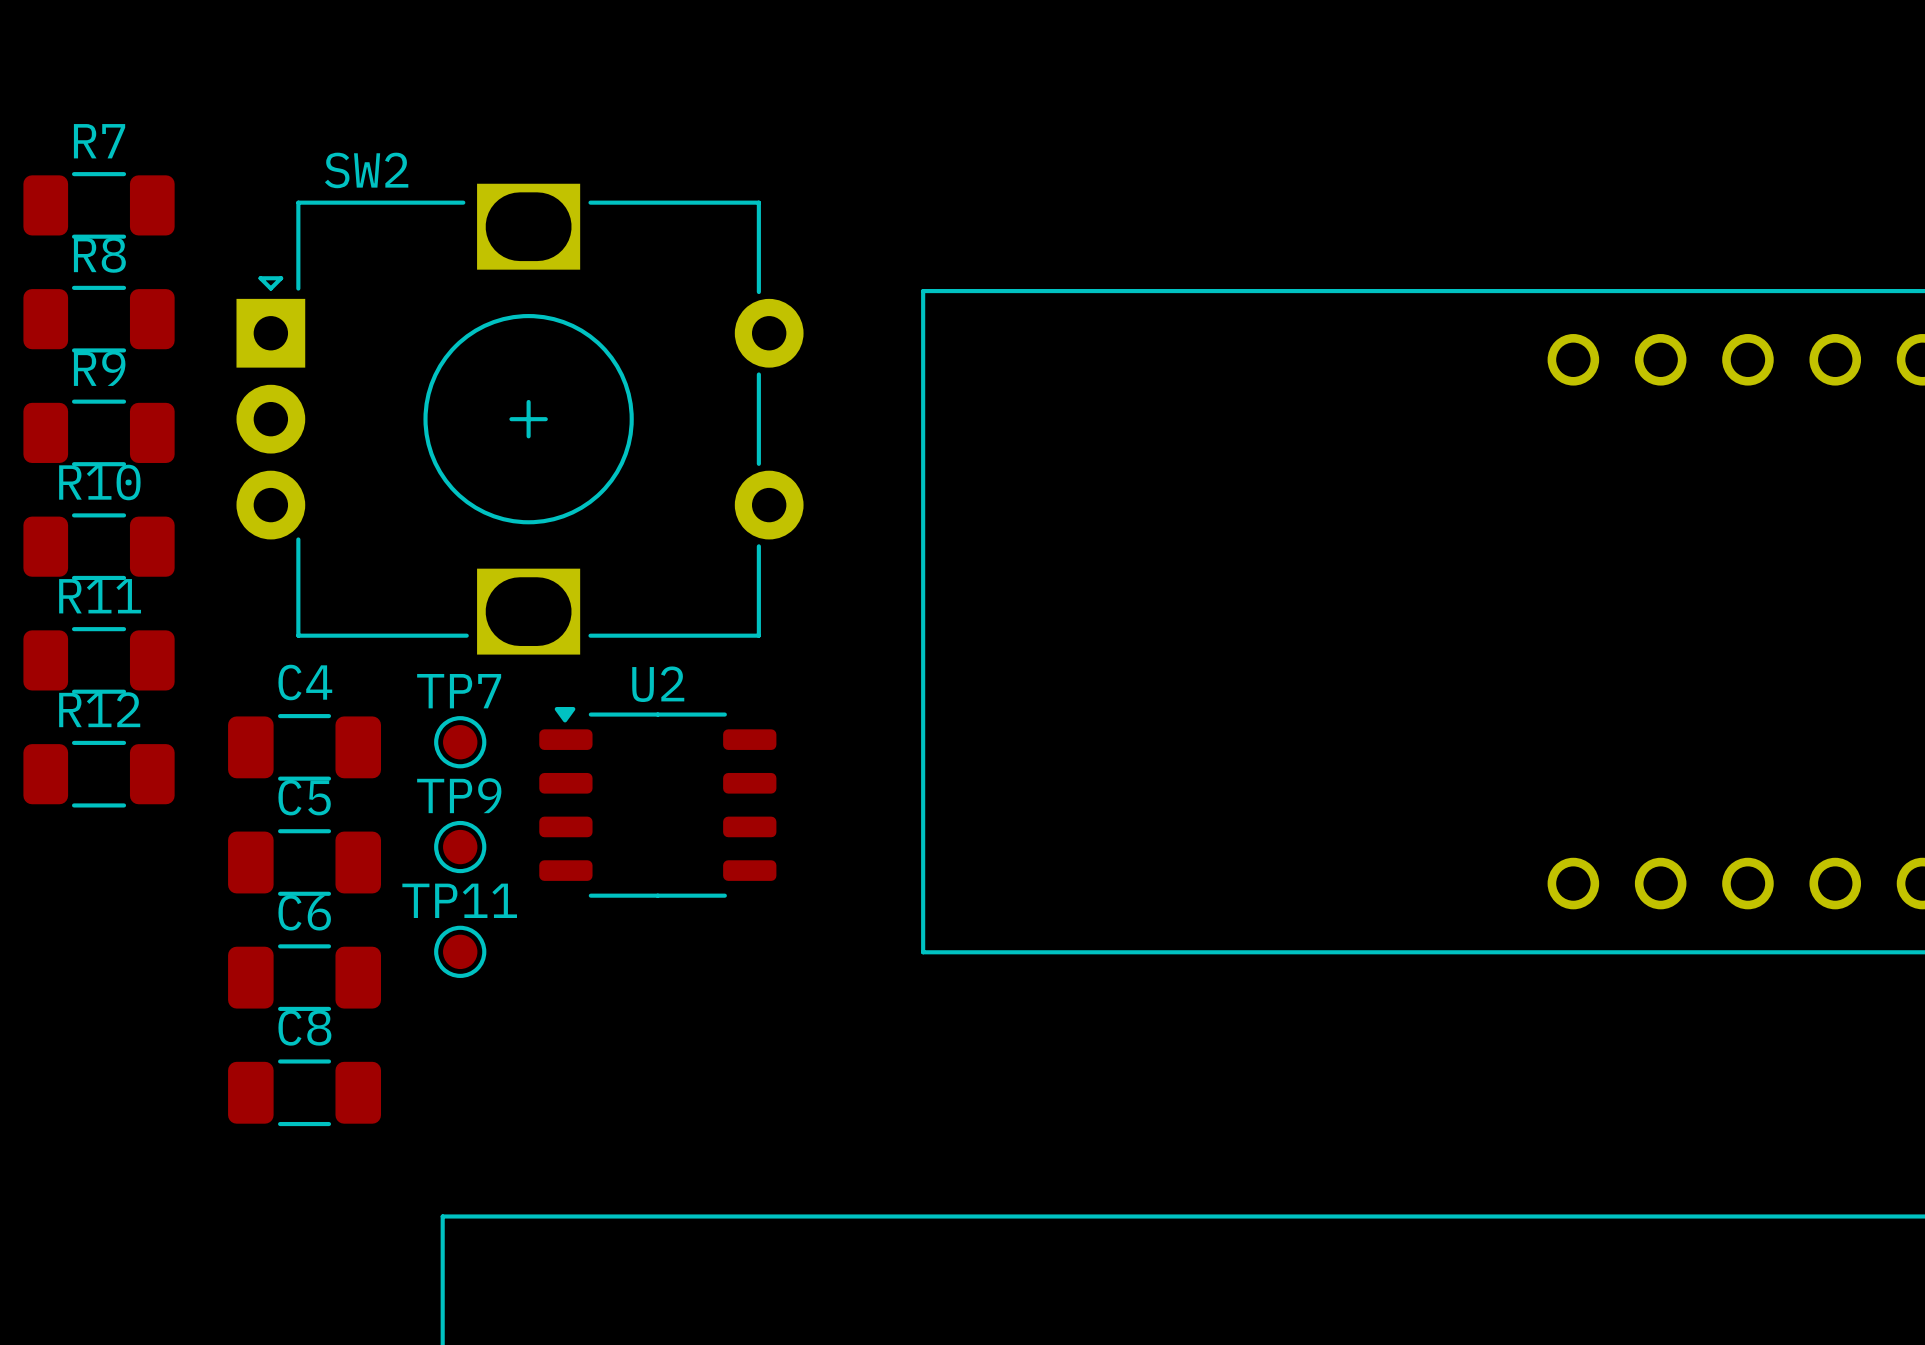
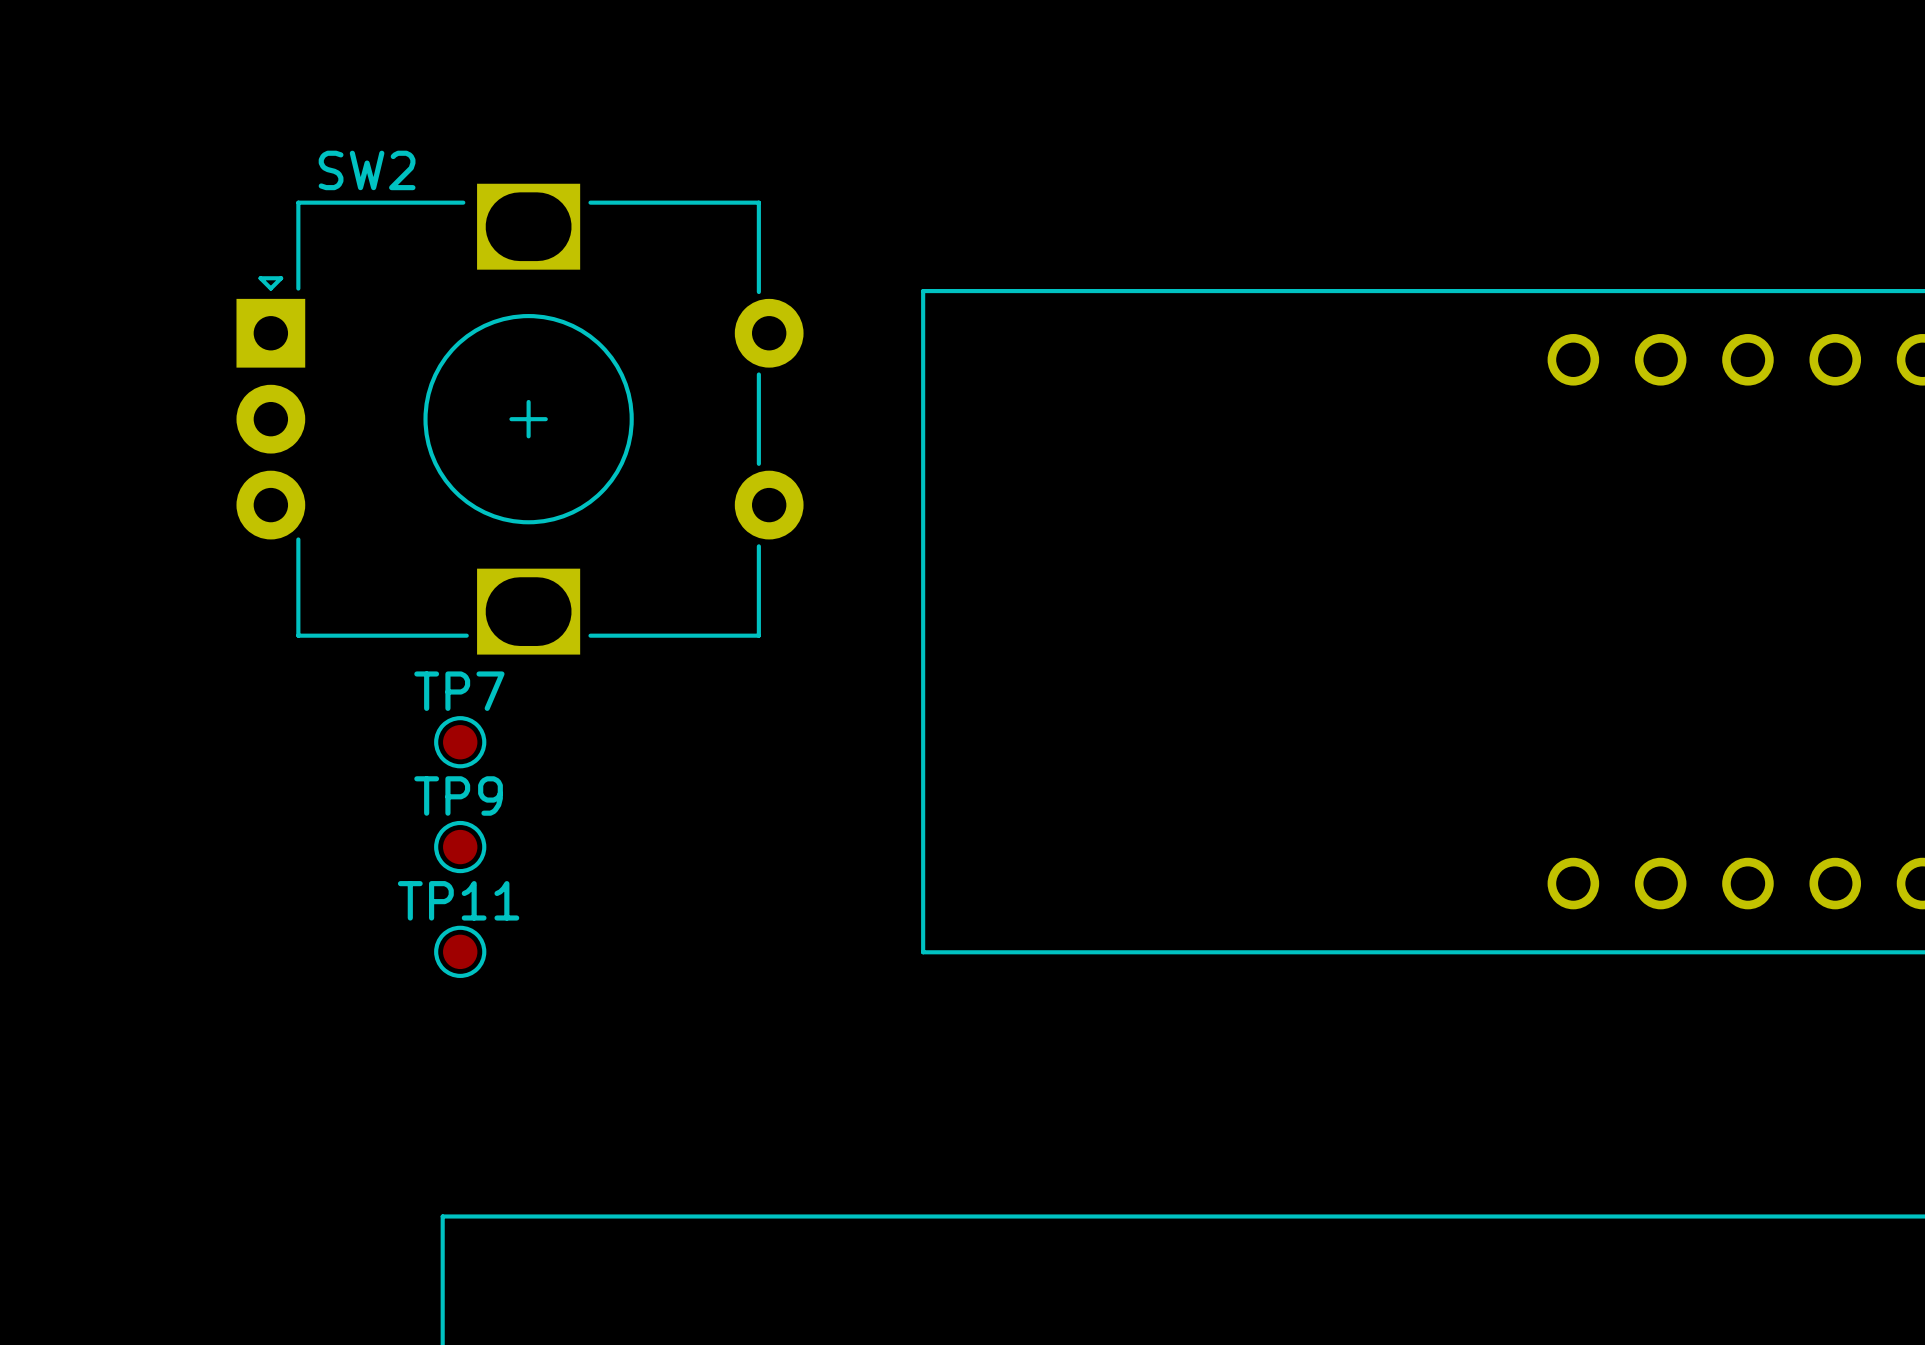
R7: (99, 205) -> none
R8: (99, 319) -> none
R9: (99, 432) -> none
R10: (99, 546) -> none
R11: (99, 660) -> none
C4: (304, 747) -> none
R12: (99, 774) -> none
U2: (657, 802) -> none
C5: (304, 862) -> none
C6: (304, 977) -> none
C8: (304, 1092) -> none

